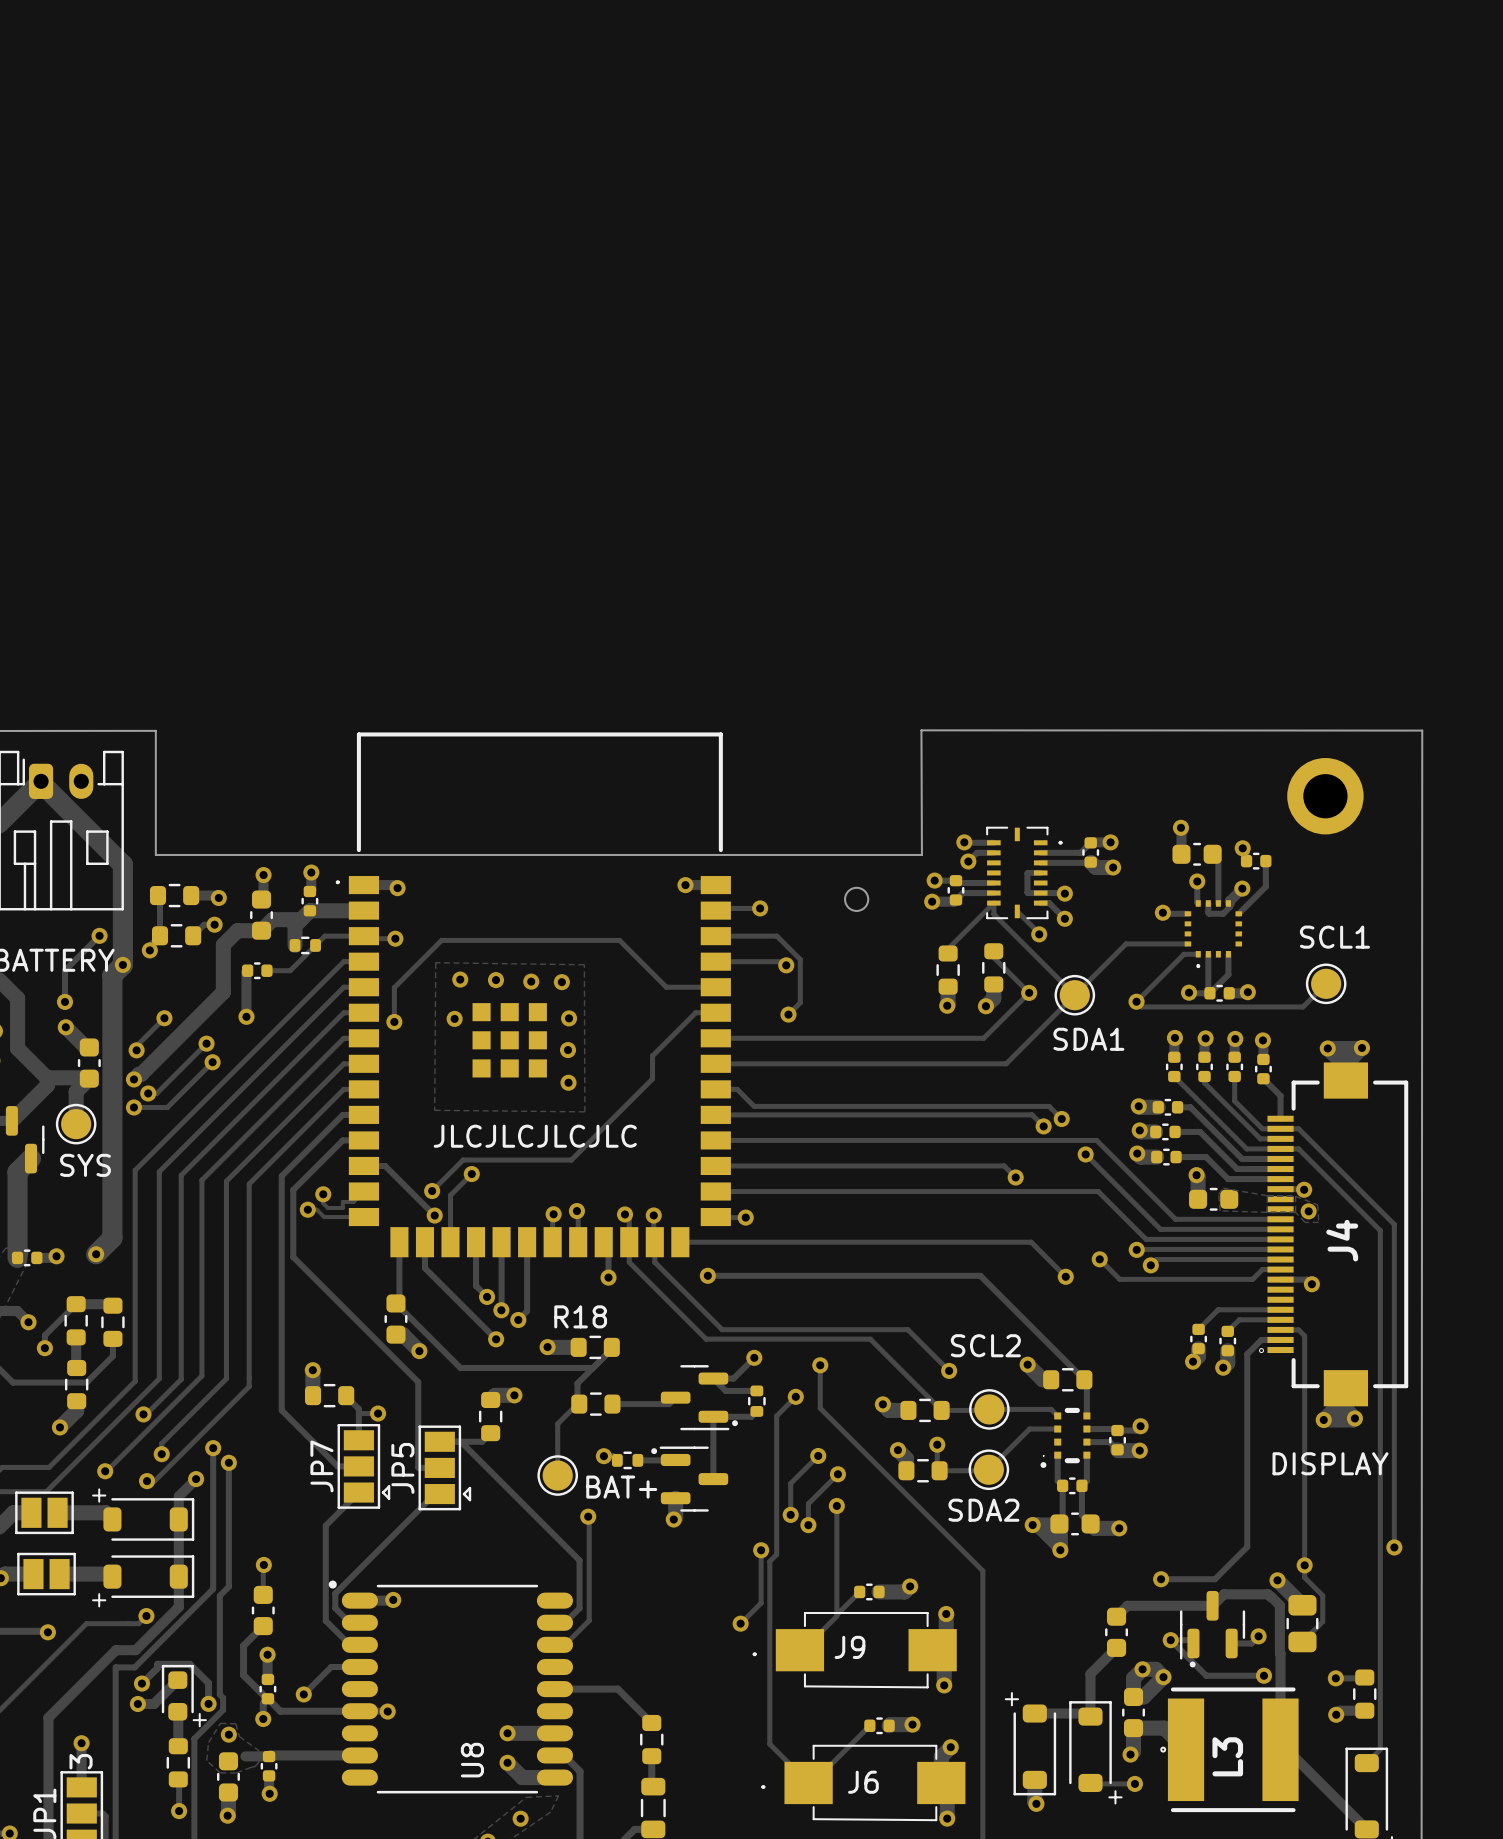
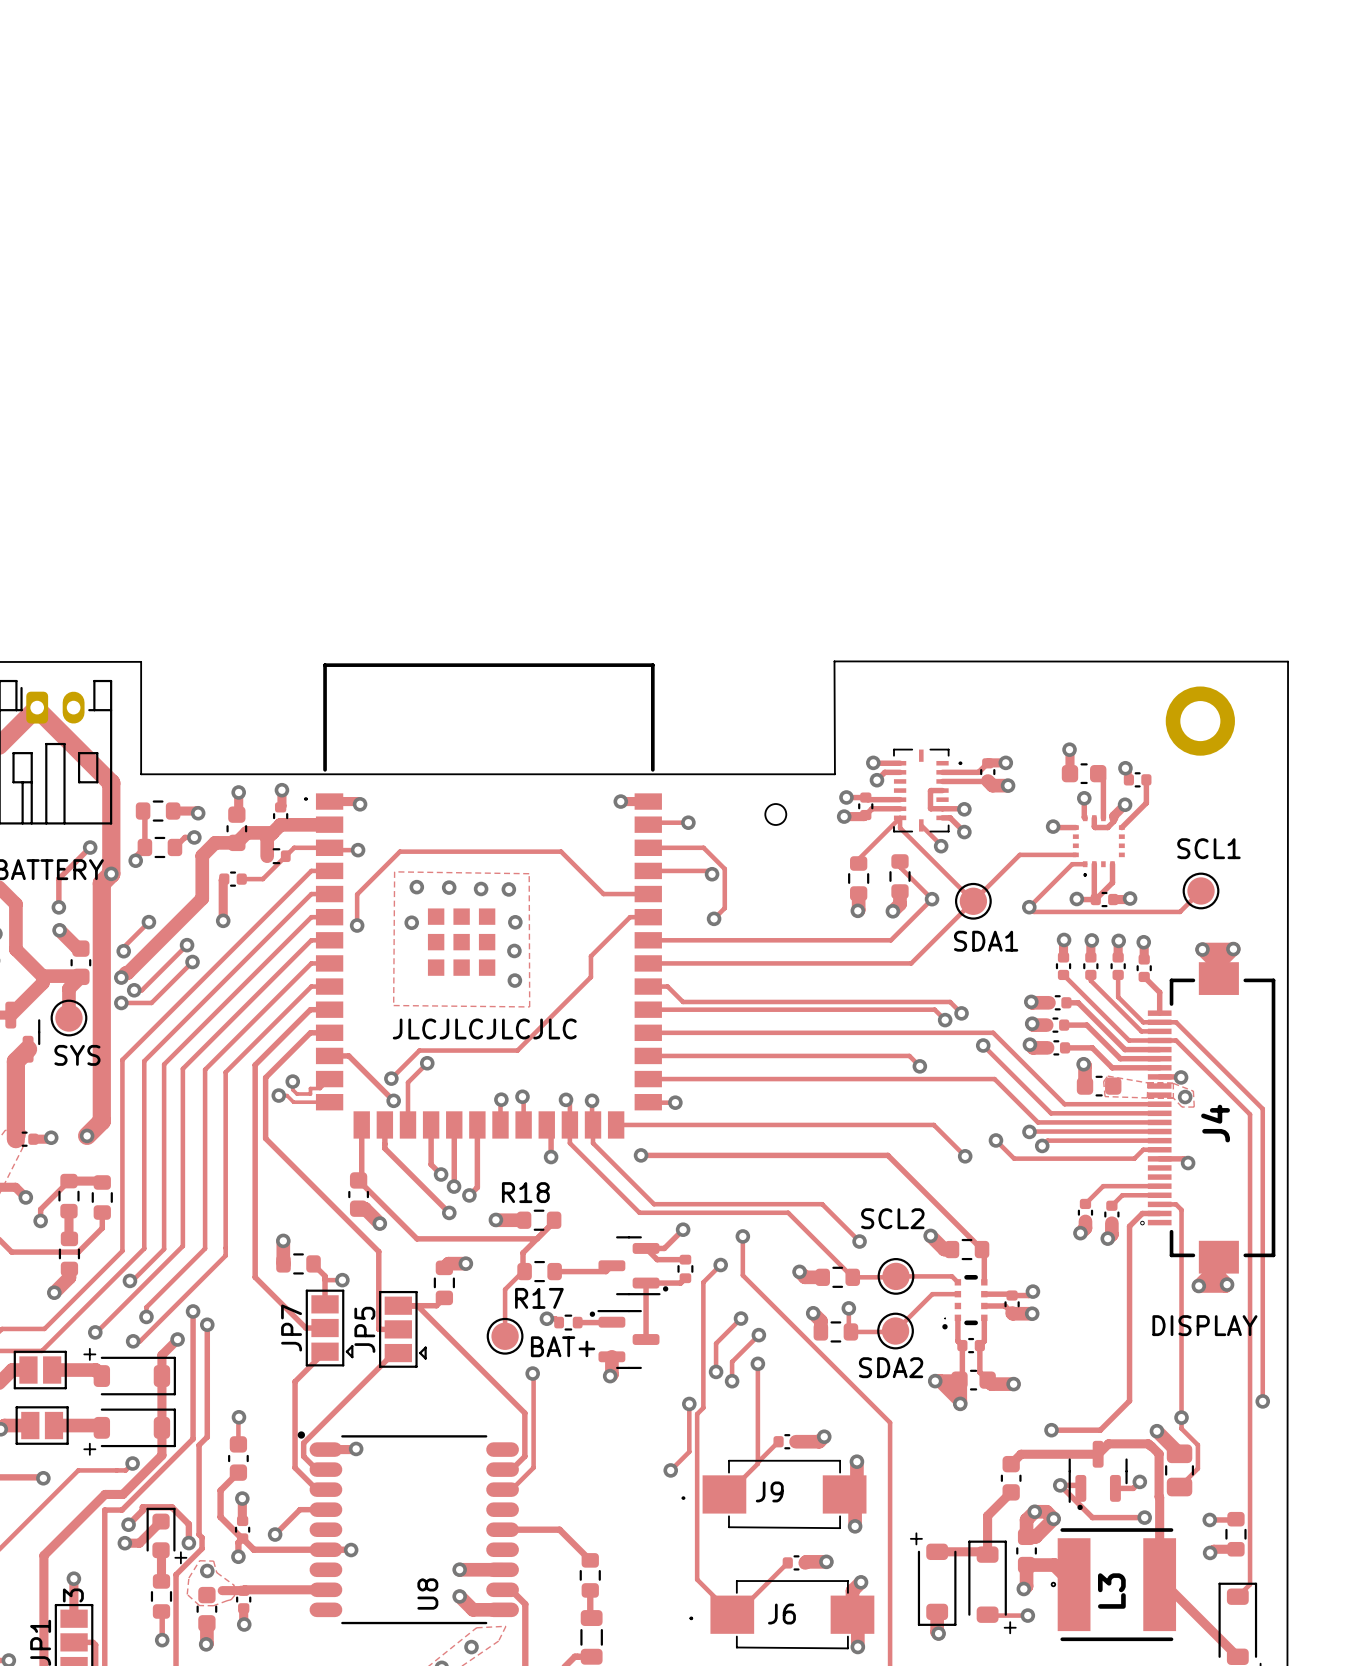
R17 name: none -> R17 (539, 1298)

